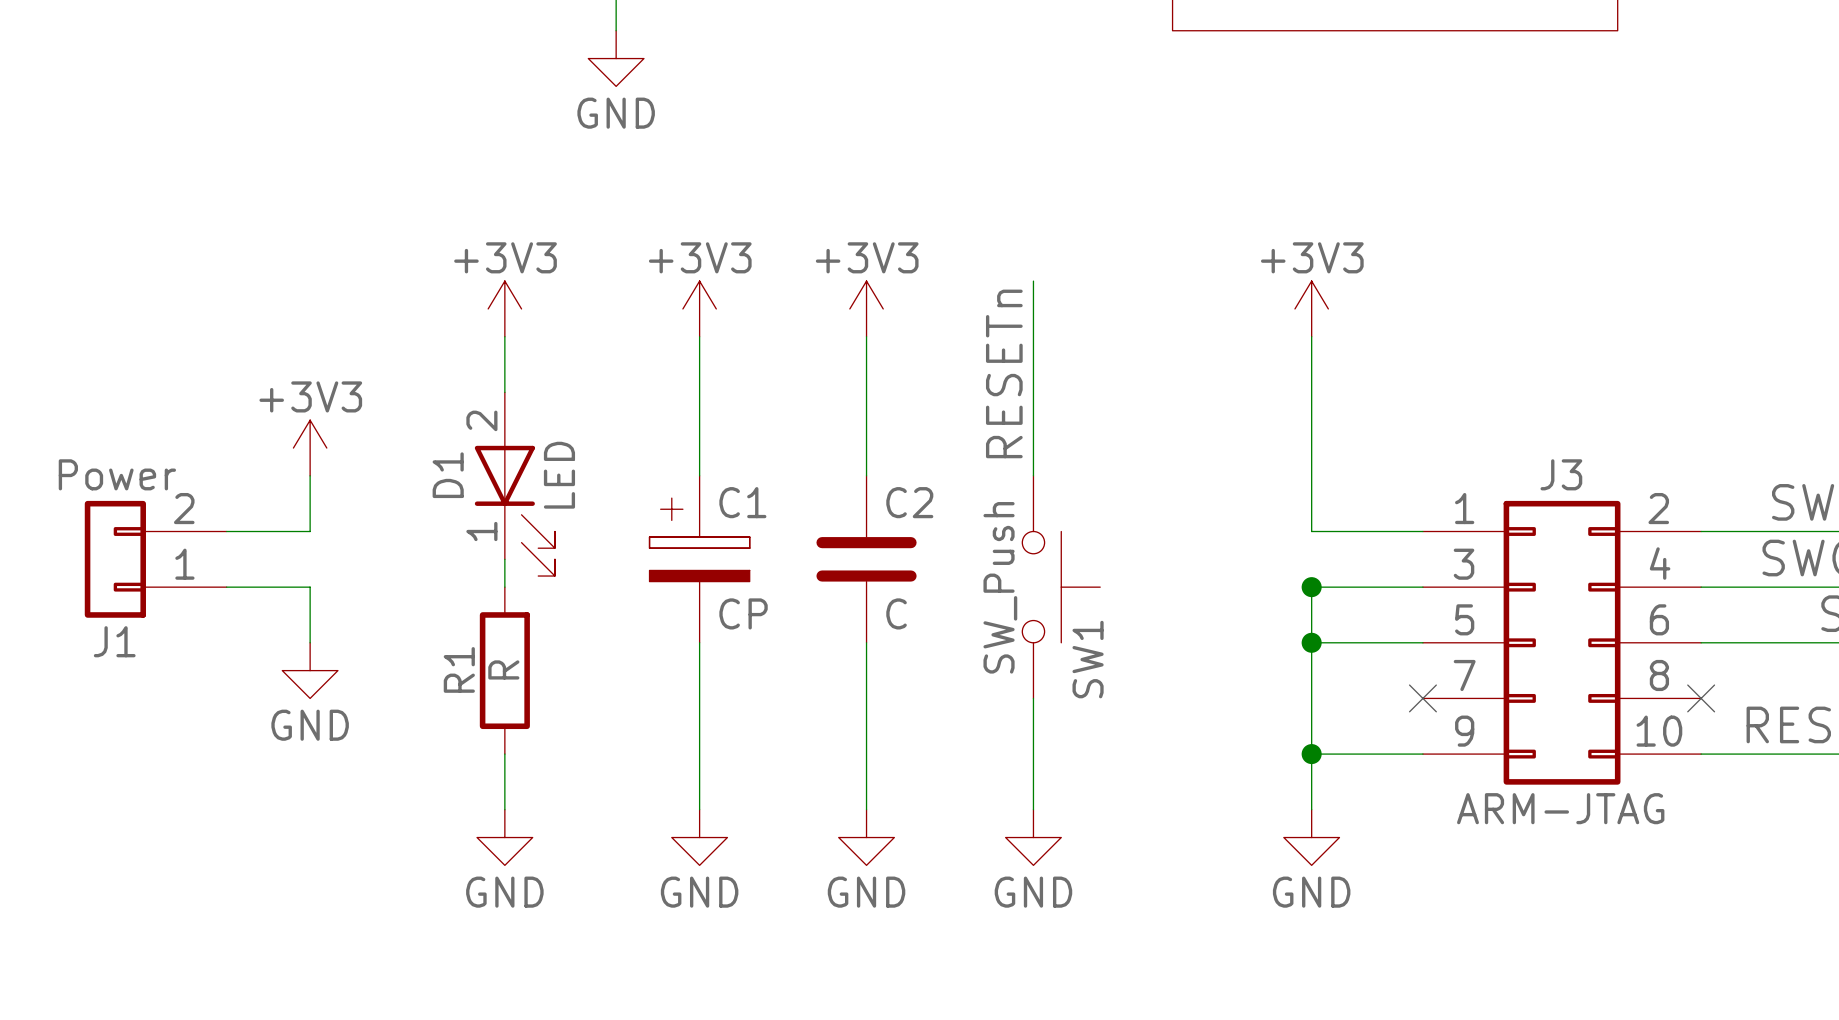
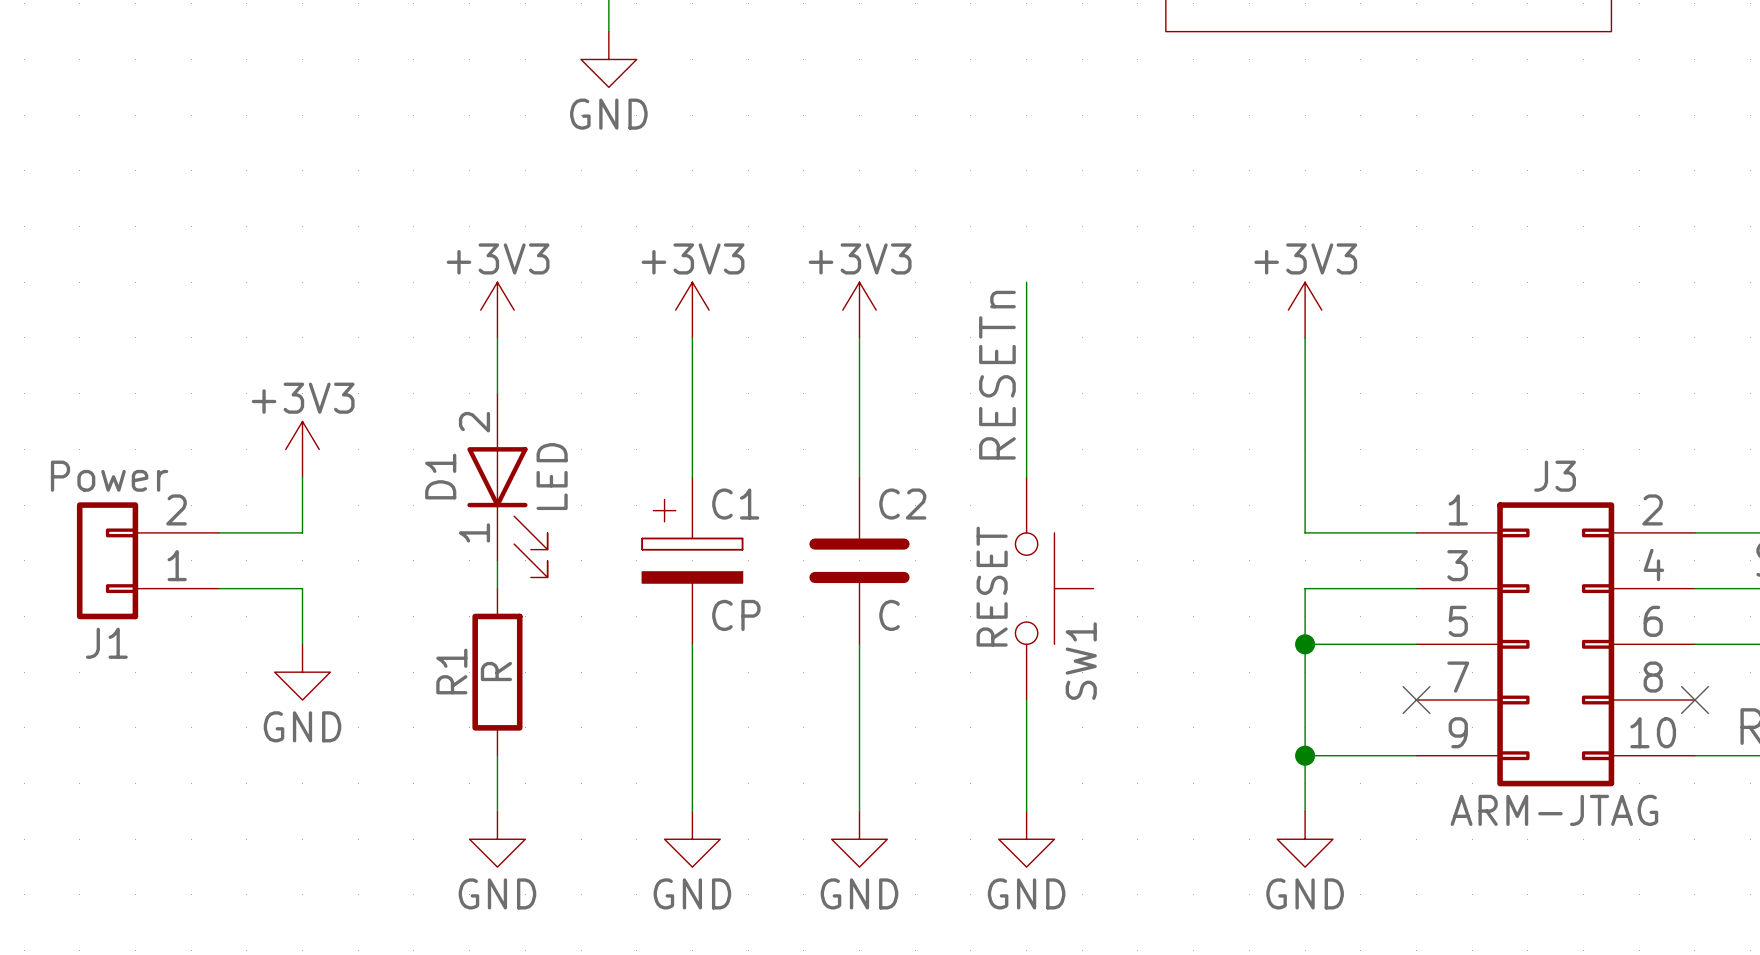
SW1 value: SW_Push (1000, 587) -> RESET (992, 586)
junction: (1311, 587) -> none

